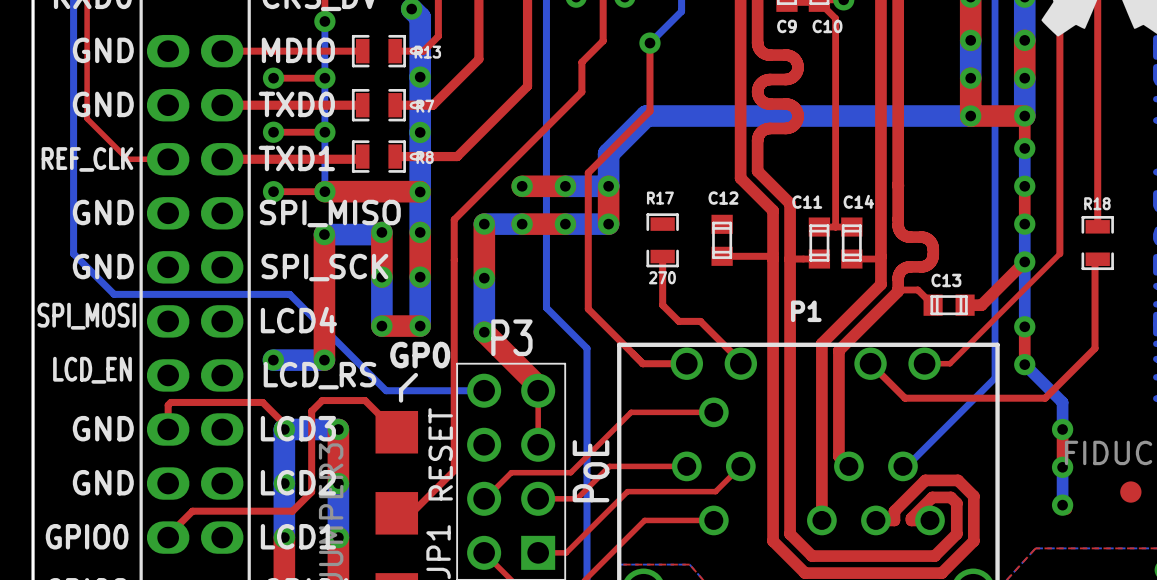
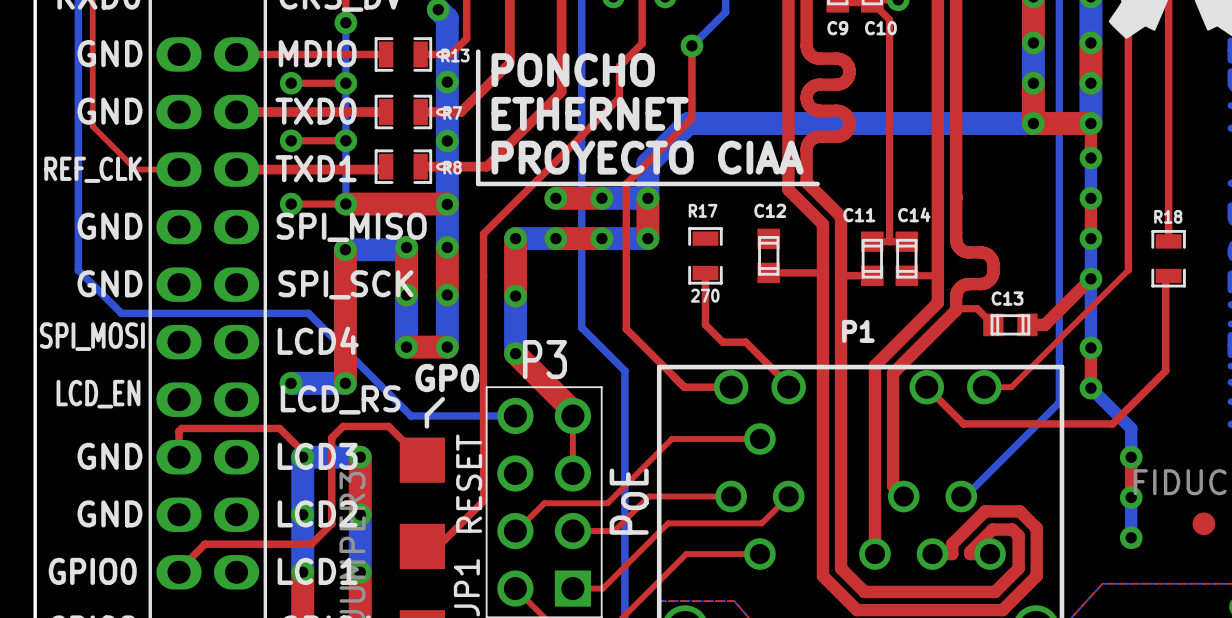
line: none -> (478, 51) (478, 183) (817, 183)
text: none -> PONCHO (573, 70)
text: none -> ETHERNET (590, 113)
text: none -> PROYECTO CIAA (647, 157)

